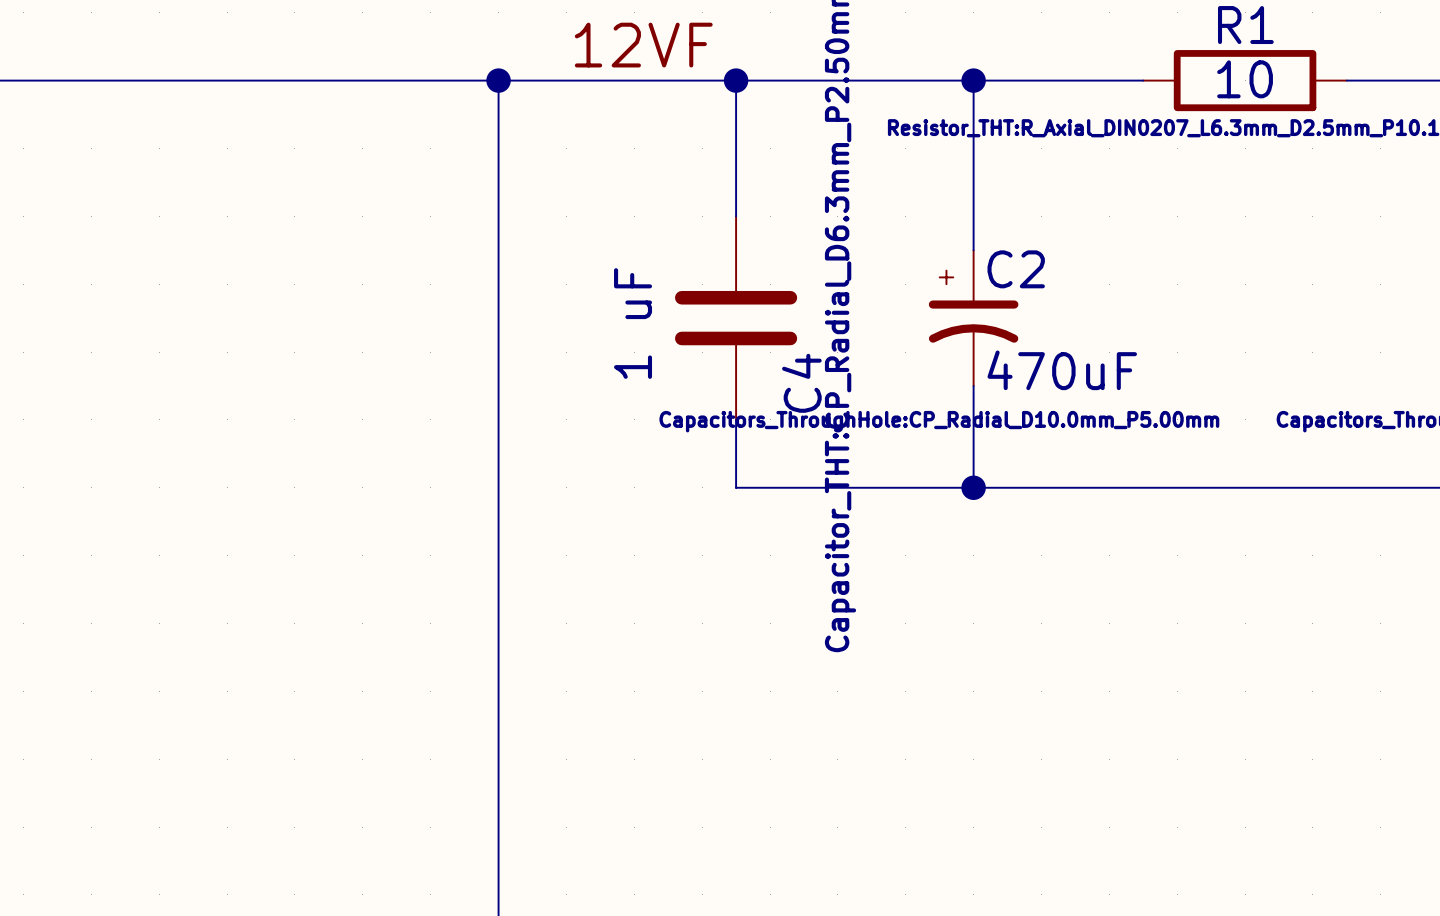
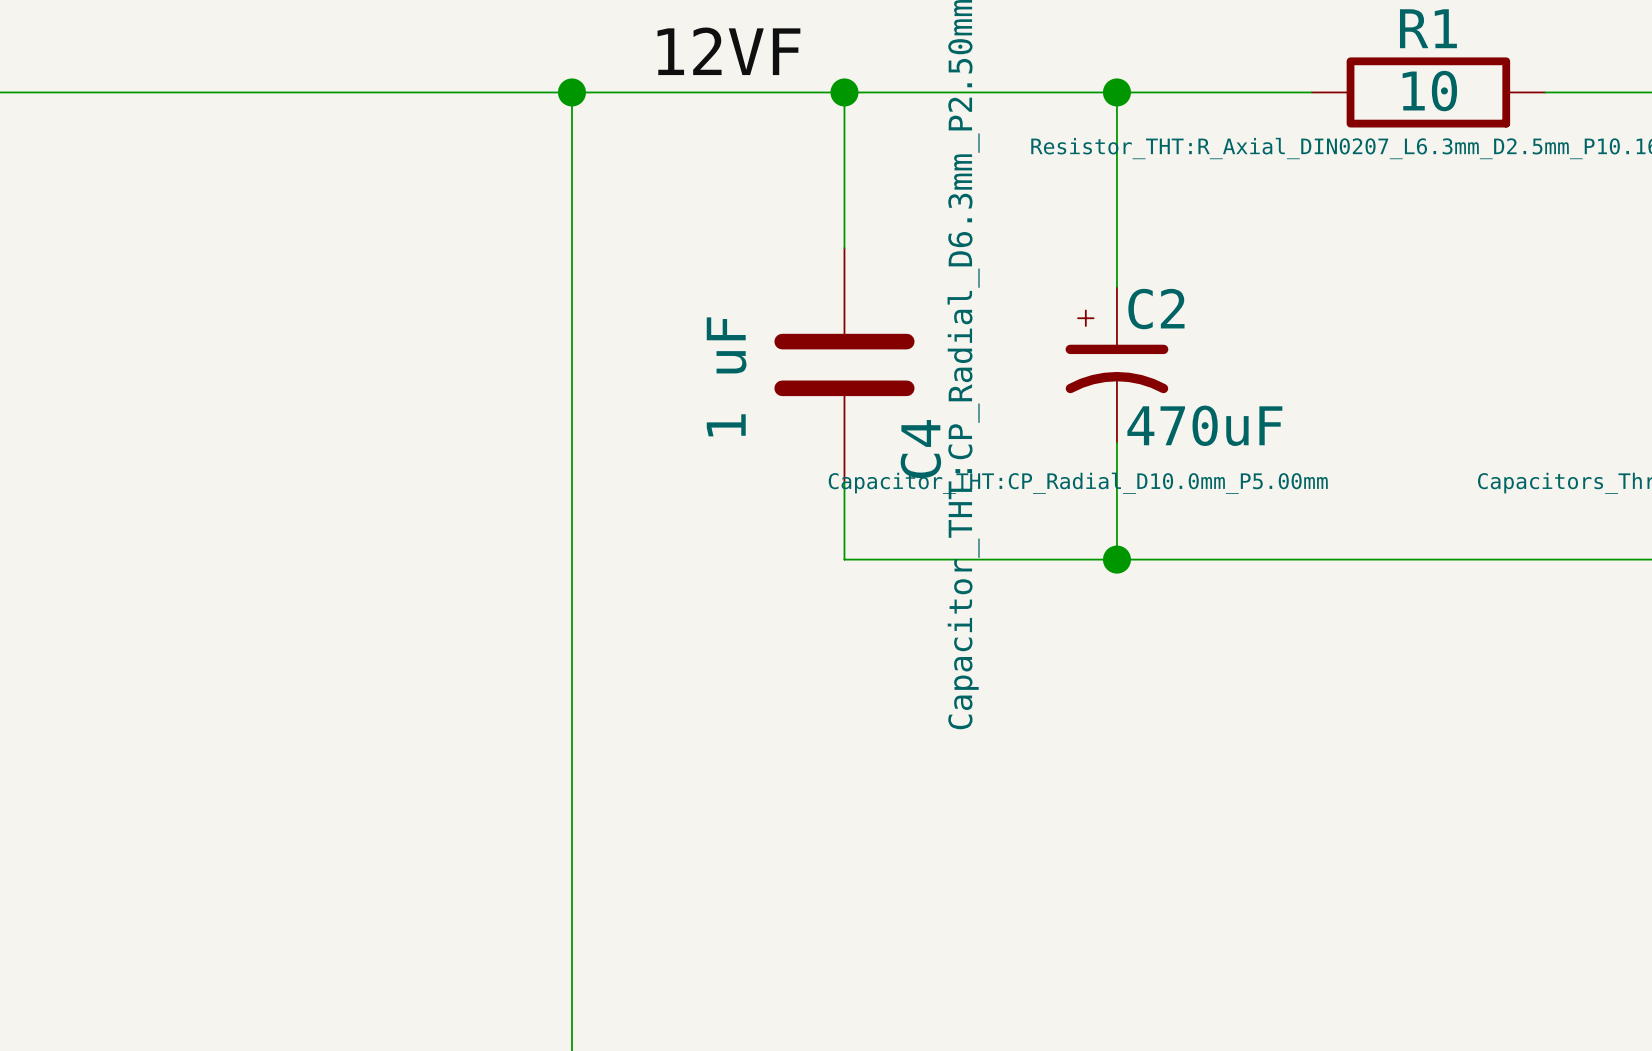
C2 text: Capacitors_ThroughHole:CP_Radial_D10.0mm_P5.00mm (939, 421) -> Capacitor_THT:CP_Radial_D10.0mm_P5.00mm (1078, 483)

